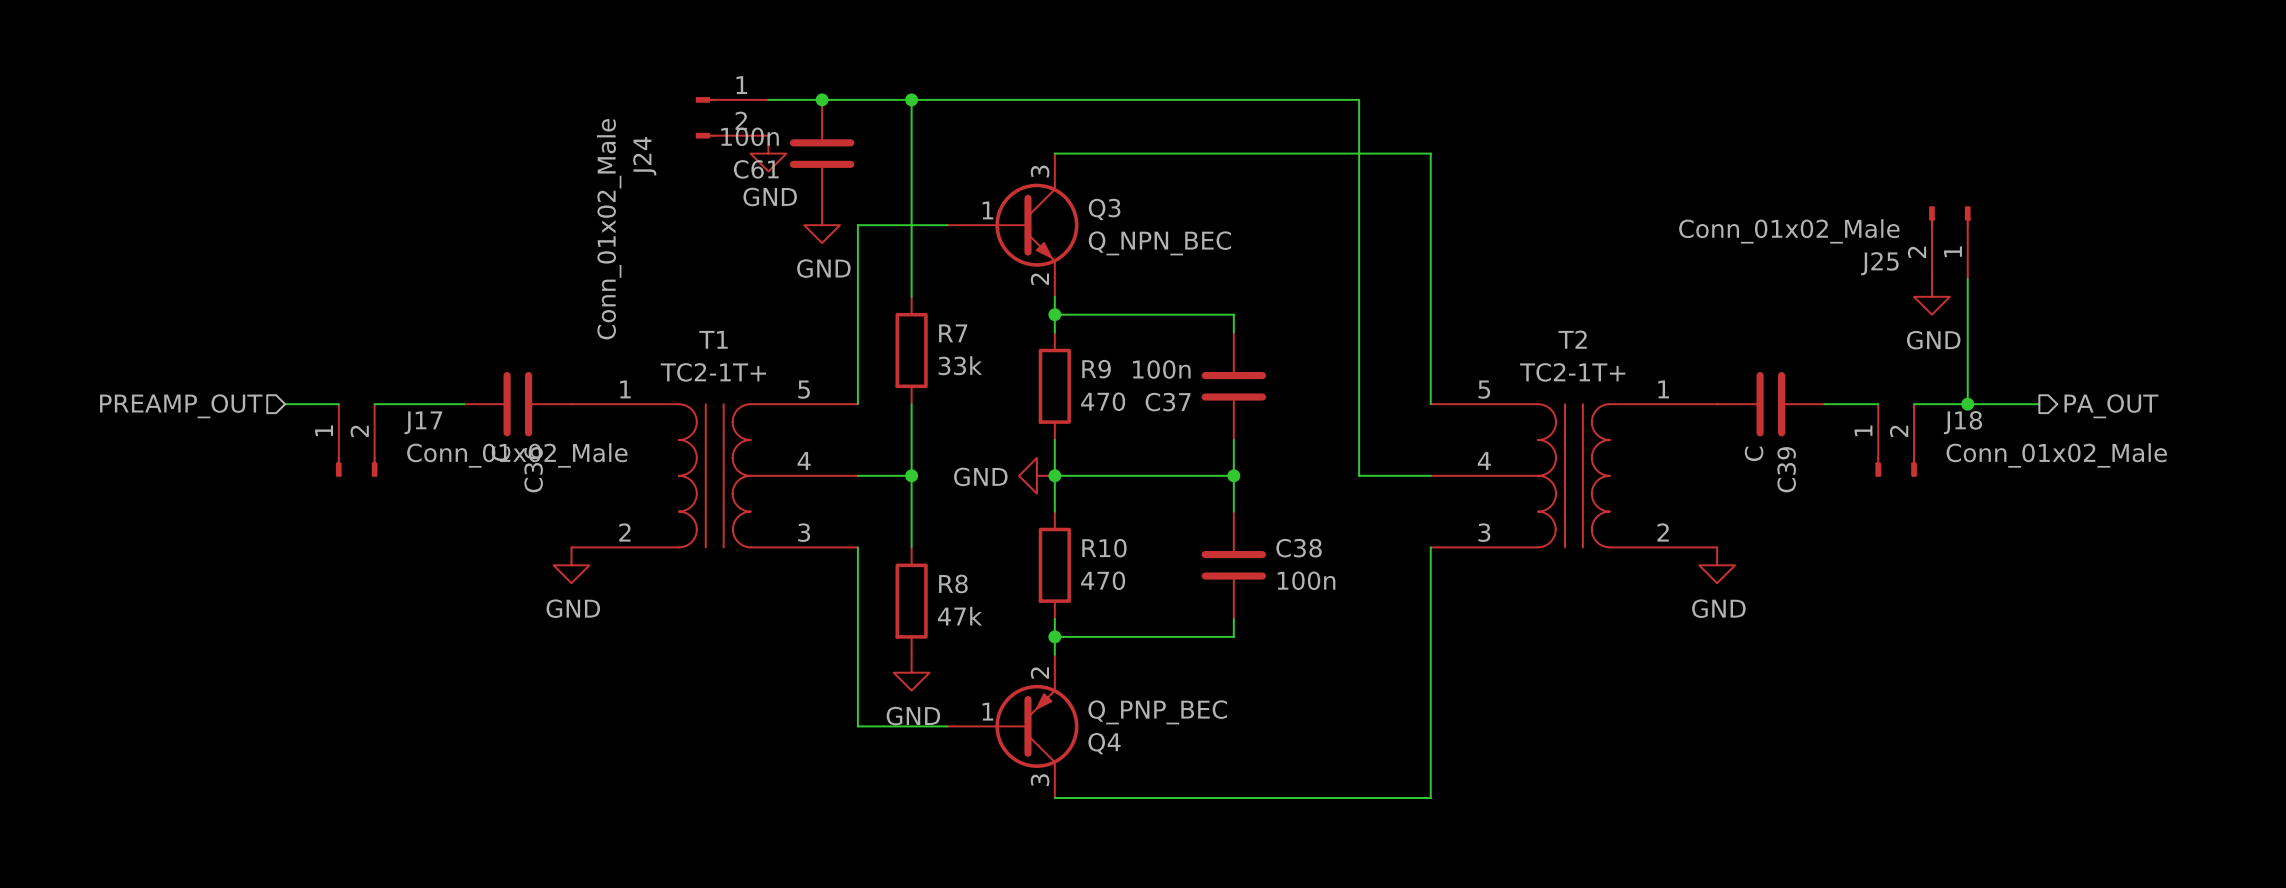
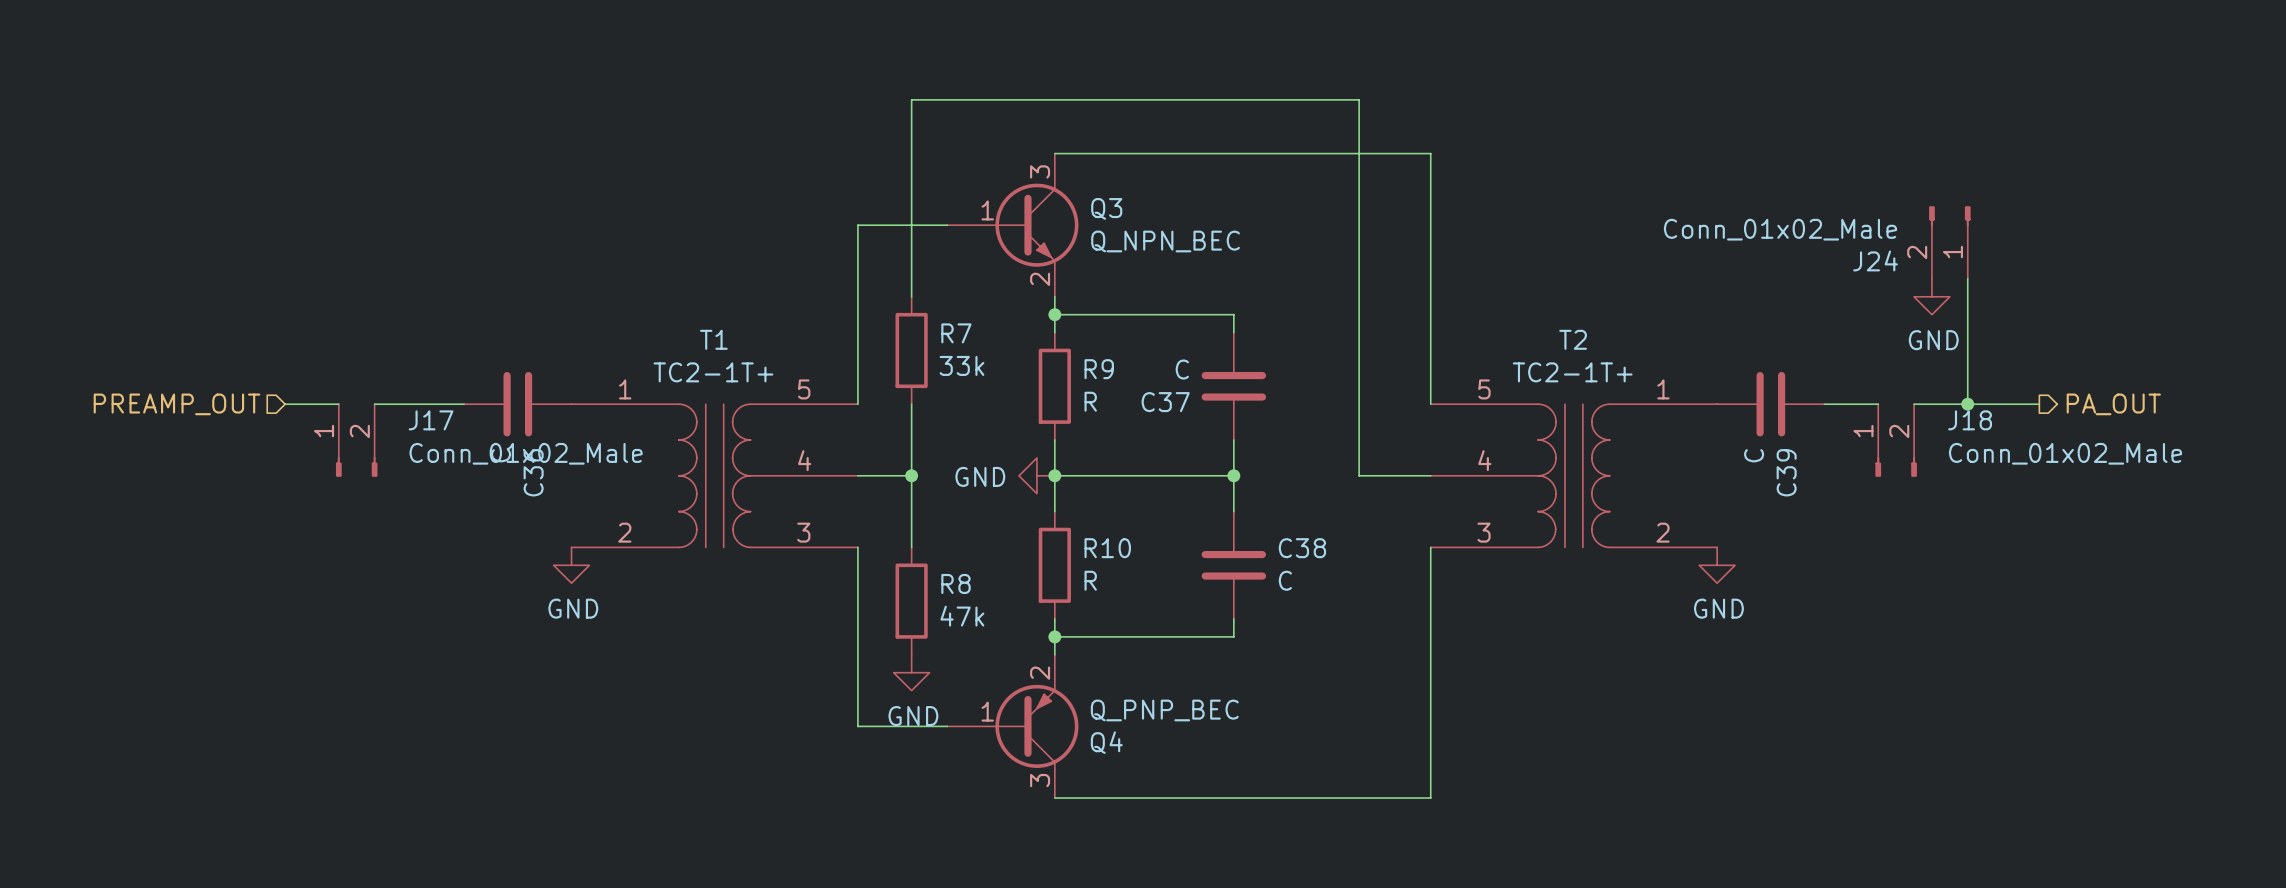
wire: (768, 99) (911, 99) -> none
junction: (822, 99) -> none
junction: (911, 99) -> none
J24: Conn_01x02_Male (732, 117) -> none
power symbol: GND (768, 153) -> none
C61: 100n (822, 153) -> none
power symbol: GND (822, 225) -> none
J25 name: J25 (1879, 263) -> J24 (1875, 260)
C37 value: 100n (1161, 369) -> C (1182, 369)
R9 value: 470 (1103, 401) -> R (1090, 401)
R10 value: 470 (1103, 580) -> R (1090, 580)
C38 value: 100n (1306, 580) -> C (1285, 580)

